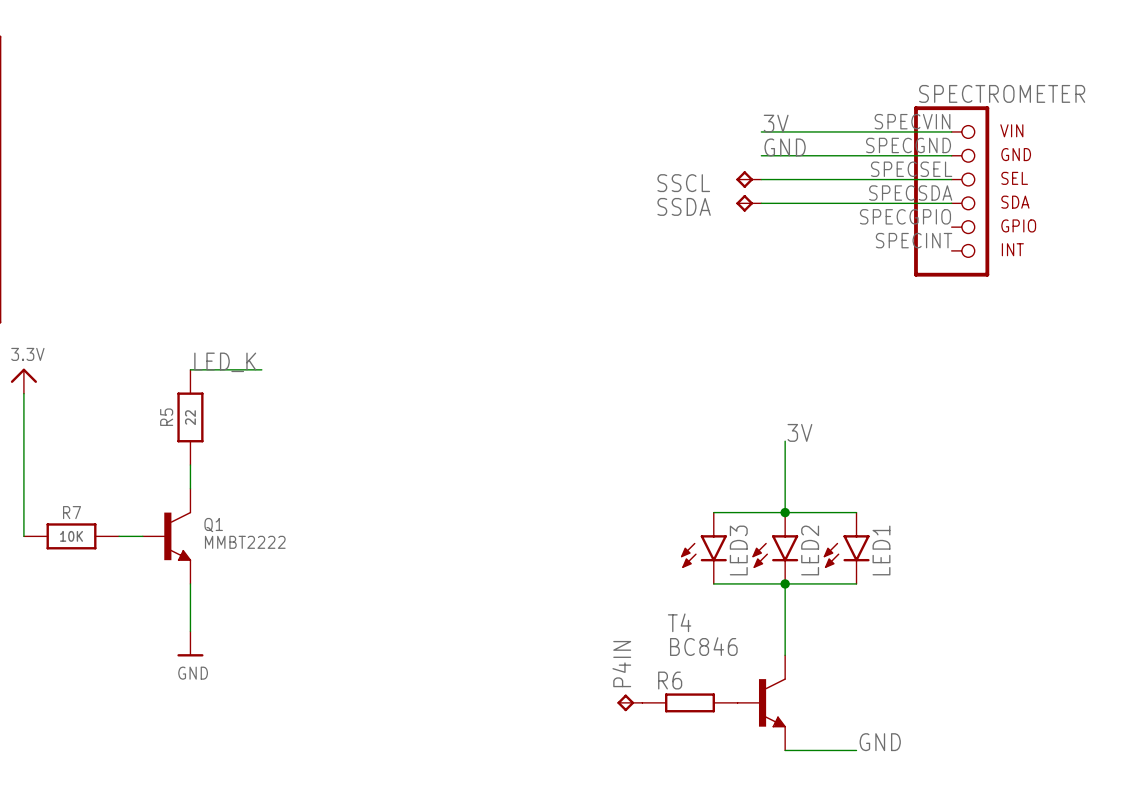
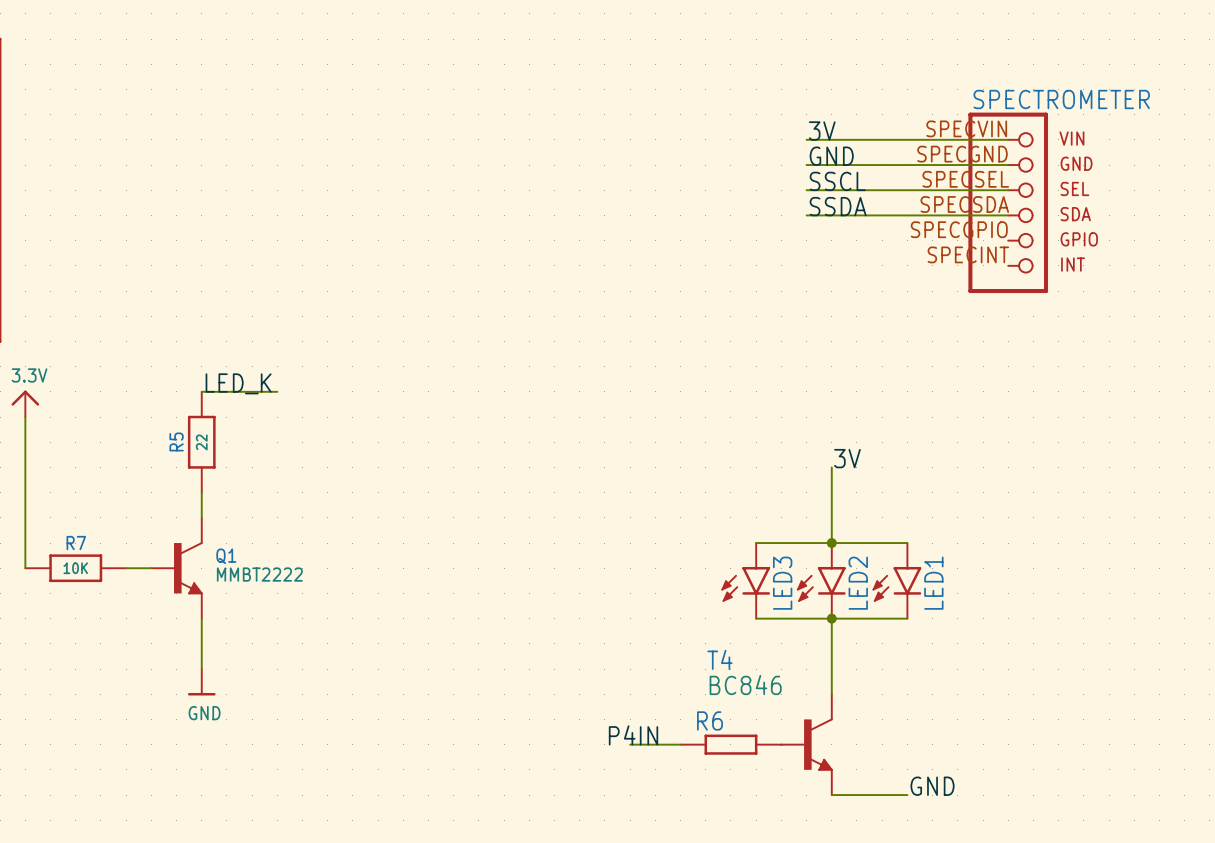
label: none -> SSCL (837, 181)
SSCL: (748, 179) -> none
label: none -> SSDA (838, 206)
SSDA: (748, 203) -> none
label: none -> P4IN (633, 735)
P4IN: (629, 702) -> none

